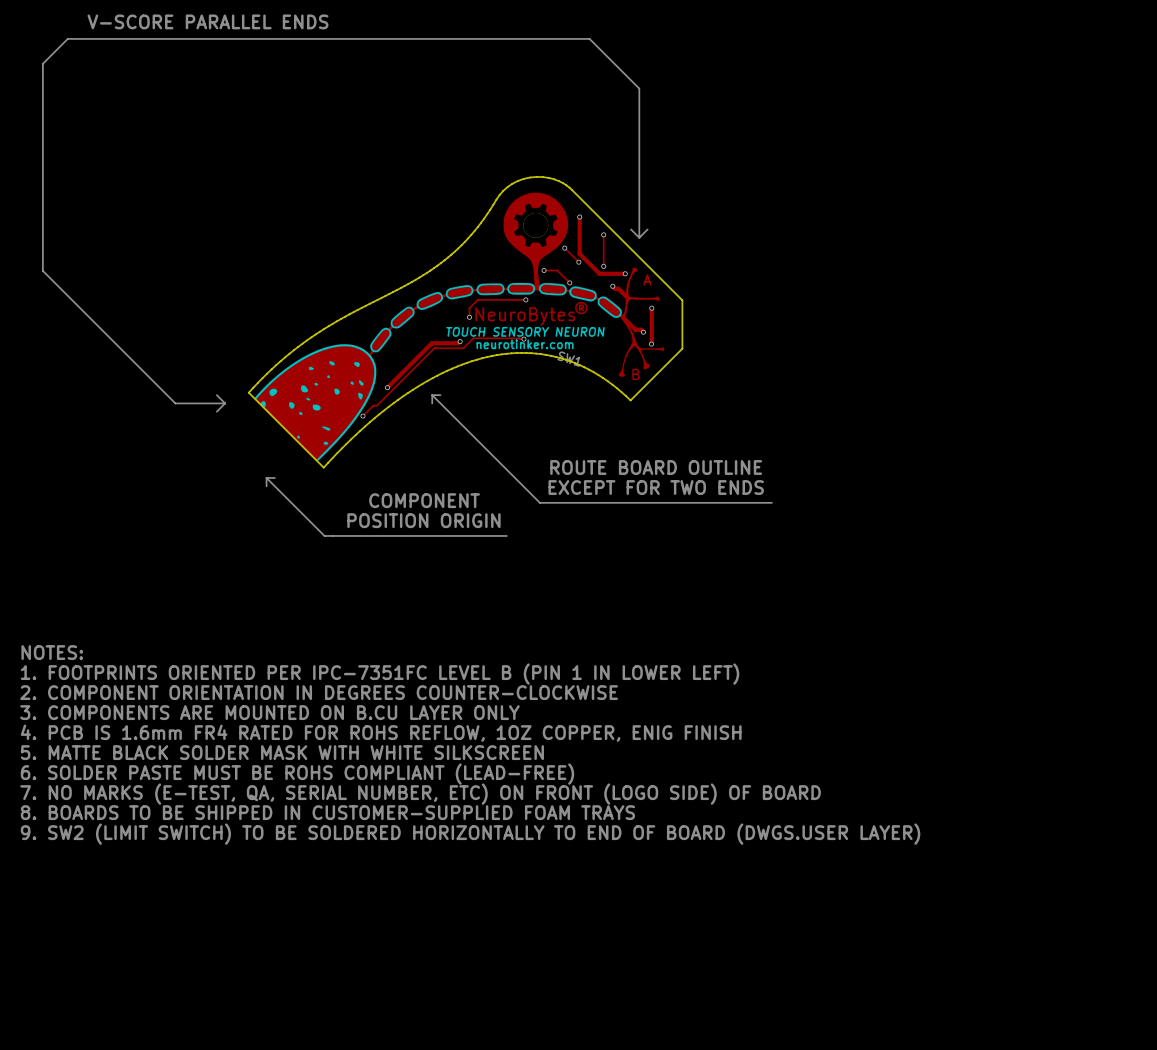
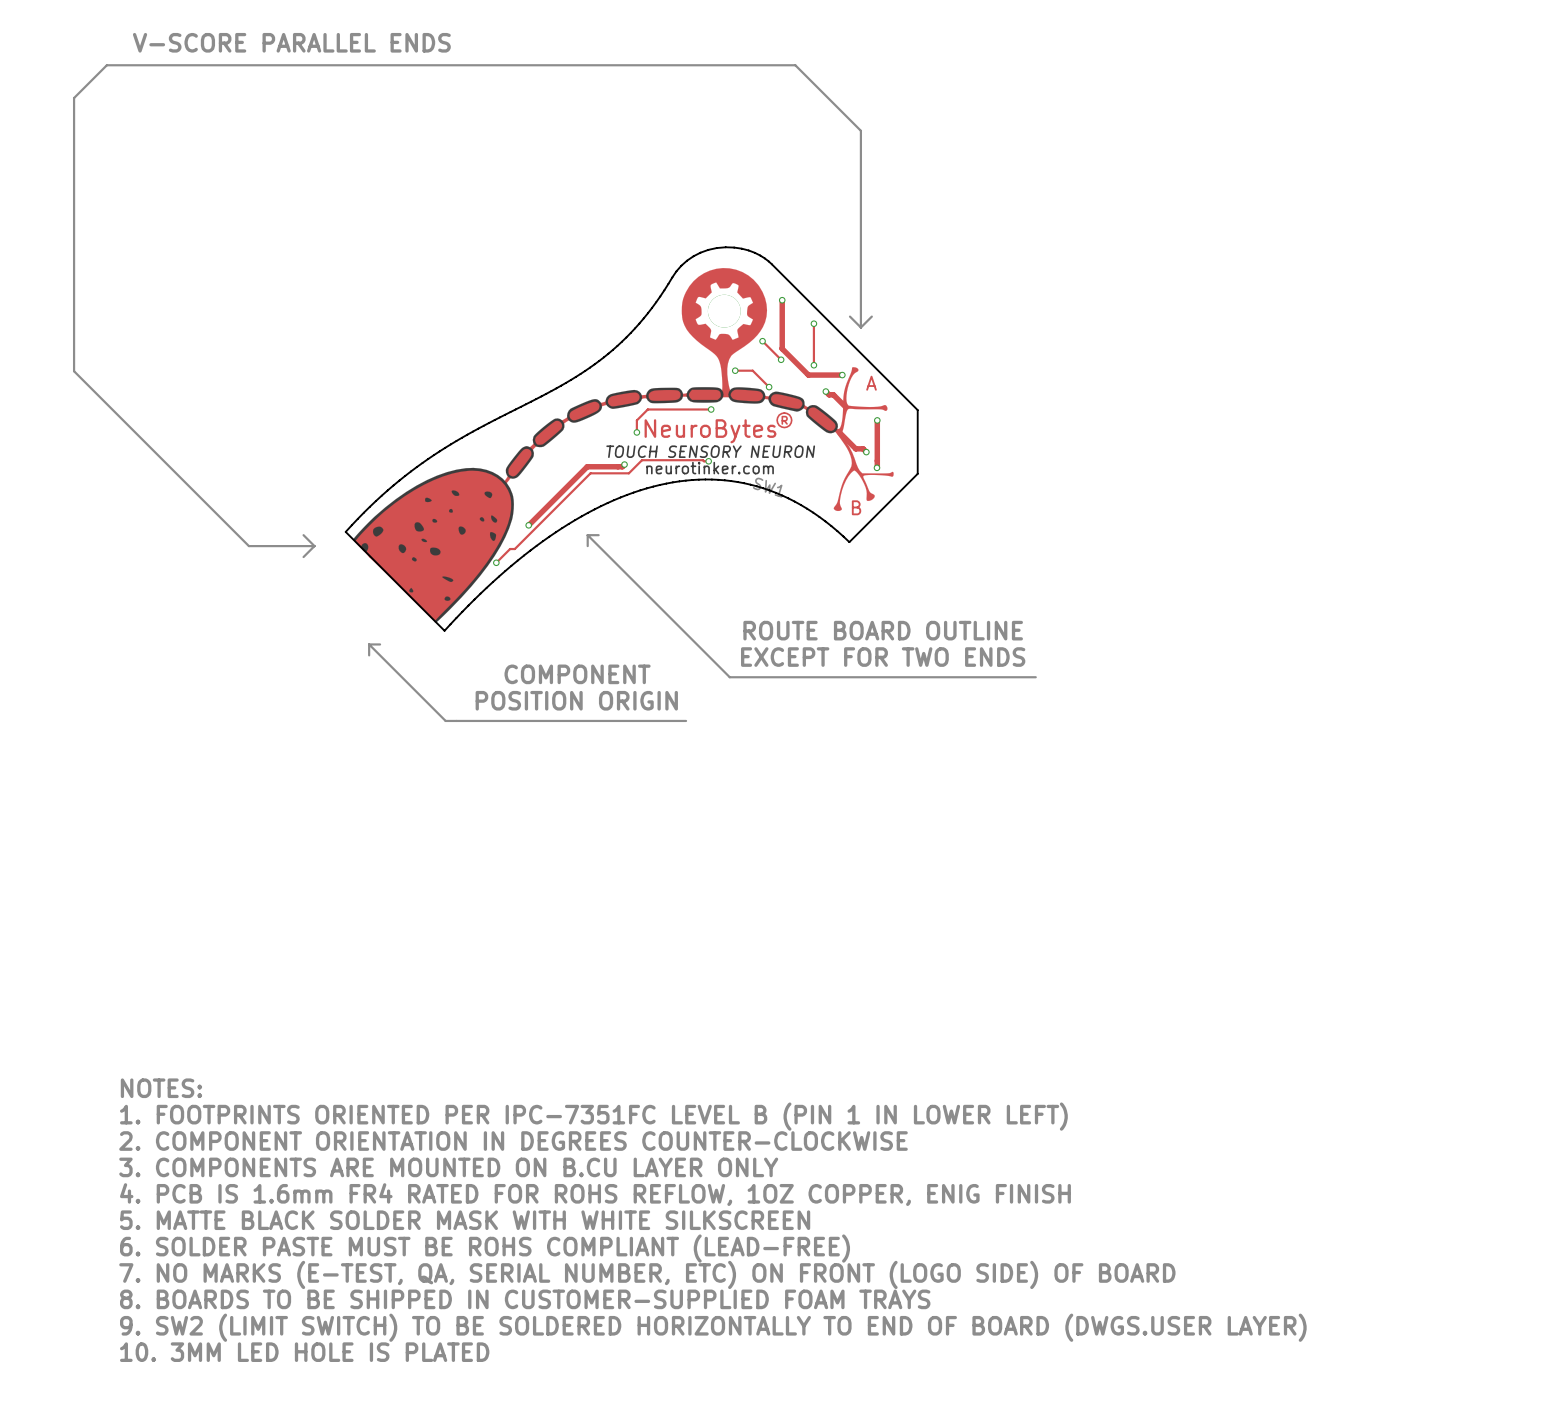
text position: NOTES: (52, 652) -> NOTES: (161, 1088)
text position: 1. FOOTPRINTS ORIENTED PER IPC-7351FC LEVEL B (PIN 1 IN LOWER LEFT) (380, 674) -> 1. FOOTPRINTS ORIENTED PER IPC-7351FC LEVEL B (PIN 1 IN LOWER LEFT) (593, 1116)
text position: 2. COMPONENT ORIENTATION IN DEGREES COUNTER-CLOCKWISE (319, 692) -> 2. COMPONENT ORIENTATION IN DEGREES COUNTER-CLOCKWISE (513, 1141)
text position: 3. COMPONENTS ARE MOUNTED ON B.CU LAYER ONLY (269, 712) -> 3. COMPONENTS ARE MOUNTED ON B.CU LAYER ONLY (448, 1167)
text position: 4. PCB IS 1.6mm FR4 RATED FOR ROHS REFLOW, 1OZ COPPER, ENIG FINISH (381, 733) -> 4. PCB IS 1.6mm FR4 RATED FOR ROHS REFLOW, 1OZ COPPER, ENIG FINISH (595, 1194)
text position: 5. MATTE BLACK SOLDER MASK WITH WHITE SILKSCREEN (282, 752) -> 5. MATTE BLACK SOLDER MASK WITH WHITE SILKSCREEN (465, 1220)
text position: 6. SOLDER PASTE MUST BE ROHS COMPLIANT (LEAD-FREE) (297, 774) -> 6. SOLDER PASTE MUST BE ROHS COMPLIANT (LEAD-FREE) (485, 1248)
text position: 7. NO MARKS (E-TEST, QA, SERIAL NUMBER, ETC) ON FRONT (LOGO SIDE) OF BOARD (420, 794) -> 7. NO MARKS (E-TEST, QA, SERIAL NUMBER, ETC) ON FRONT (LOGO SIDE) OF BOARD (647, 1274)
text position: 8. BOARDS TO BE SHIPPED IN CUSTOMER-SUPPLIED FOAM TRAYS (327, 812) -> 8. BOARDS TO BE SHIPPED IN CUSTOMER-SUPPLIED FOAM TRAYS (525, 1299)
text position: 9. SW2 (LIMIT SWITCH) TO BE SOLDERED HORIZONTALLY TO END OF BOARD (DWGS.USER LAYER) (470, 834) -> 9. SW2 (LIMIT SWITCH) TO BE SOLDERED HORIZONTALLY TO END OF BOARD (DWGS.USER LAYER) (713, 1327)
text: none -> 10. 3MM LED HOLE IS PLATED (304, 1352)

